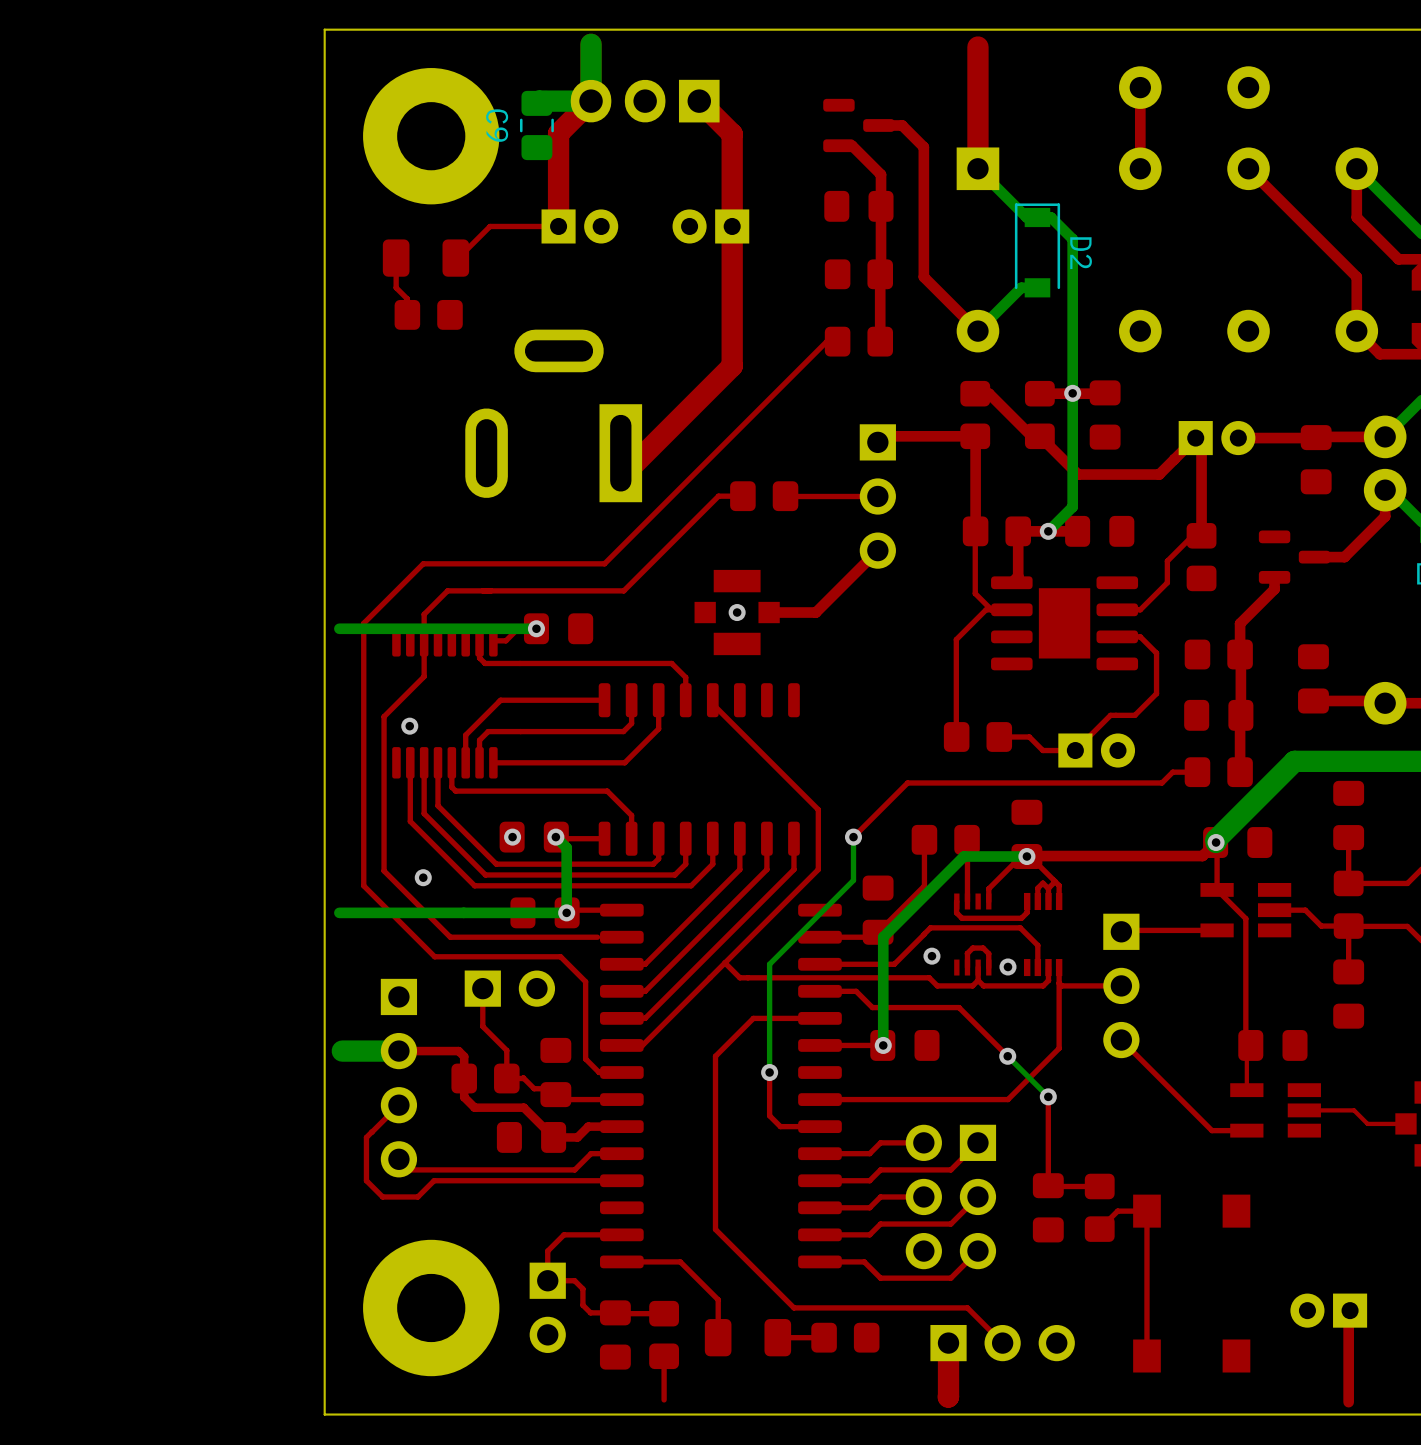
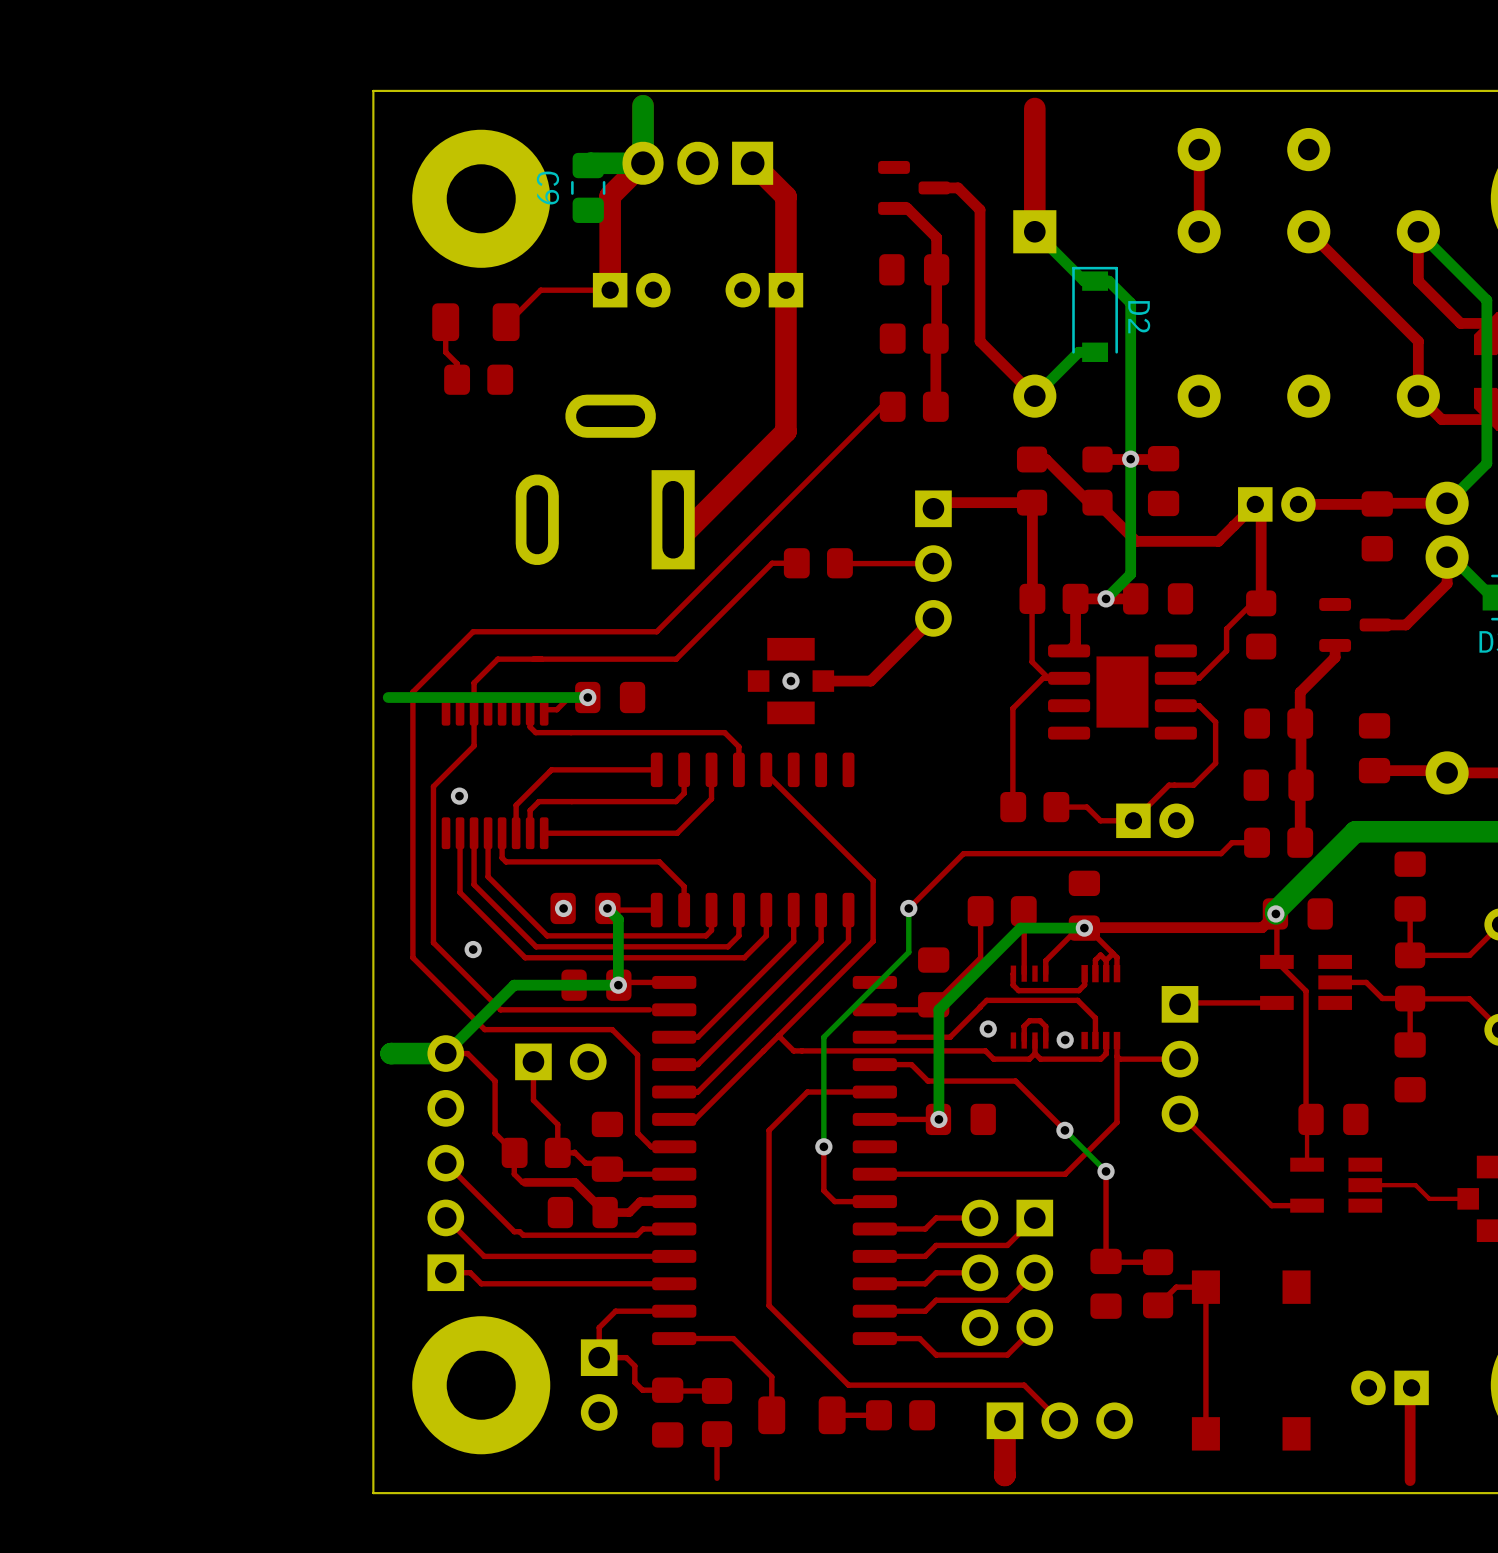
bottom track: (463, 912) (339, 912) -> (514, 985) (445, 1053) (391, 1053)
part footprint: [380, 978, 418, 1178] -> [427, 1035, 465, 1292]
top track: (398, 1051) (458, 1051) (464, 1056) (464, 1097) (474, 1107) -> (445, 1053) (467, 1053) (495, 1081) (495, 1133) (514, 1152) (514, 1174) (522, 1182) (525, 1182)
bottom track: (398, 1051) (342, 1051) -> none
top track: (398, 1105) (372, 1132) -> none
top track: (371, 1132) (366, 1137) (366, 1180) (382, 1196) (417, 1196) (434, 1180) -> (445, 1217) (484, 1256)
top track: (398, 1159) (409, 1169) (574, 1169) (584, 1159) -> (445, 1163) (514, 1231) (519, 1231) (523, 1235) (636, 1235)
top track: none -> (445, 1272) (470, 1272) (481, 1283) (674, 1283)

